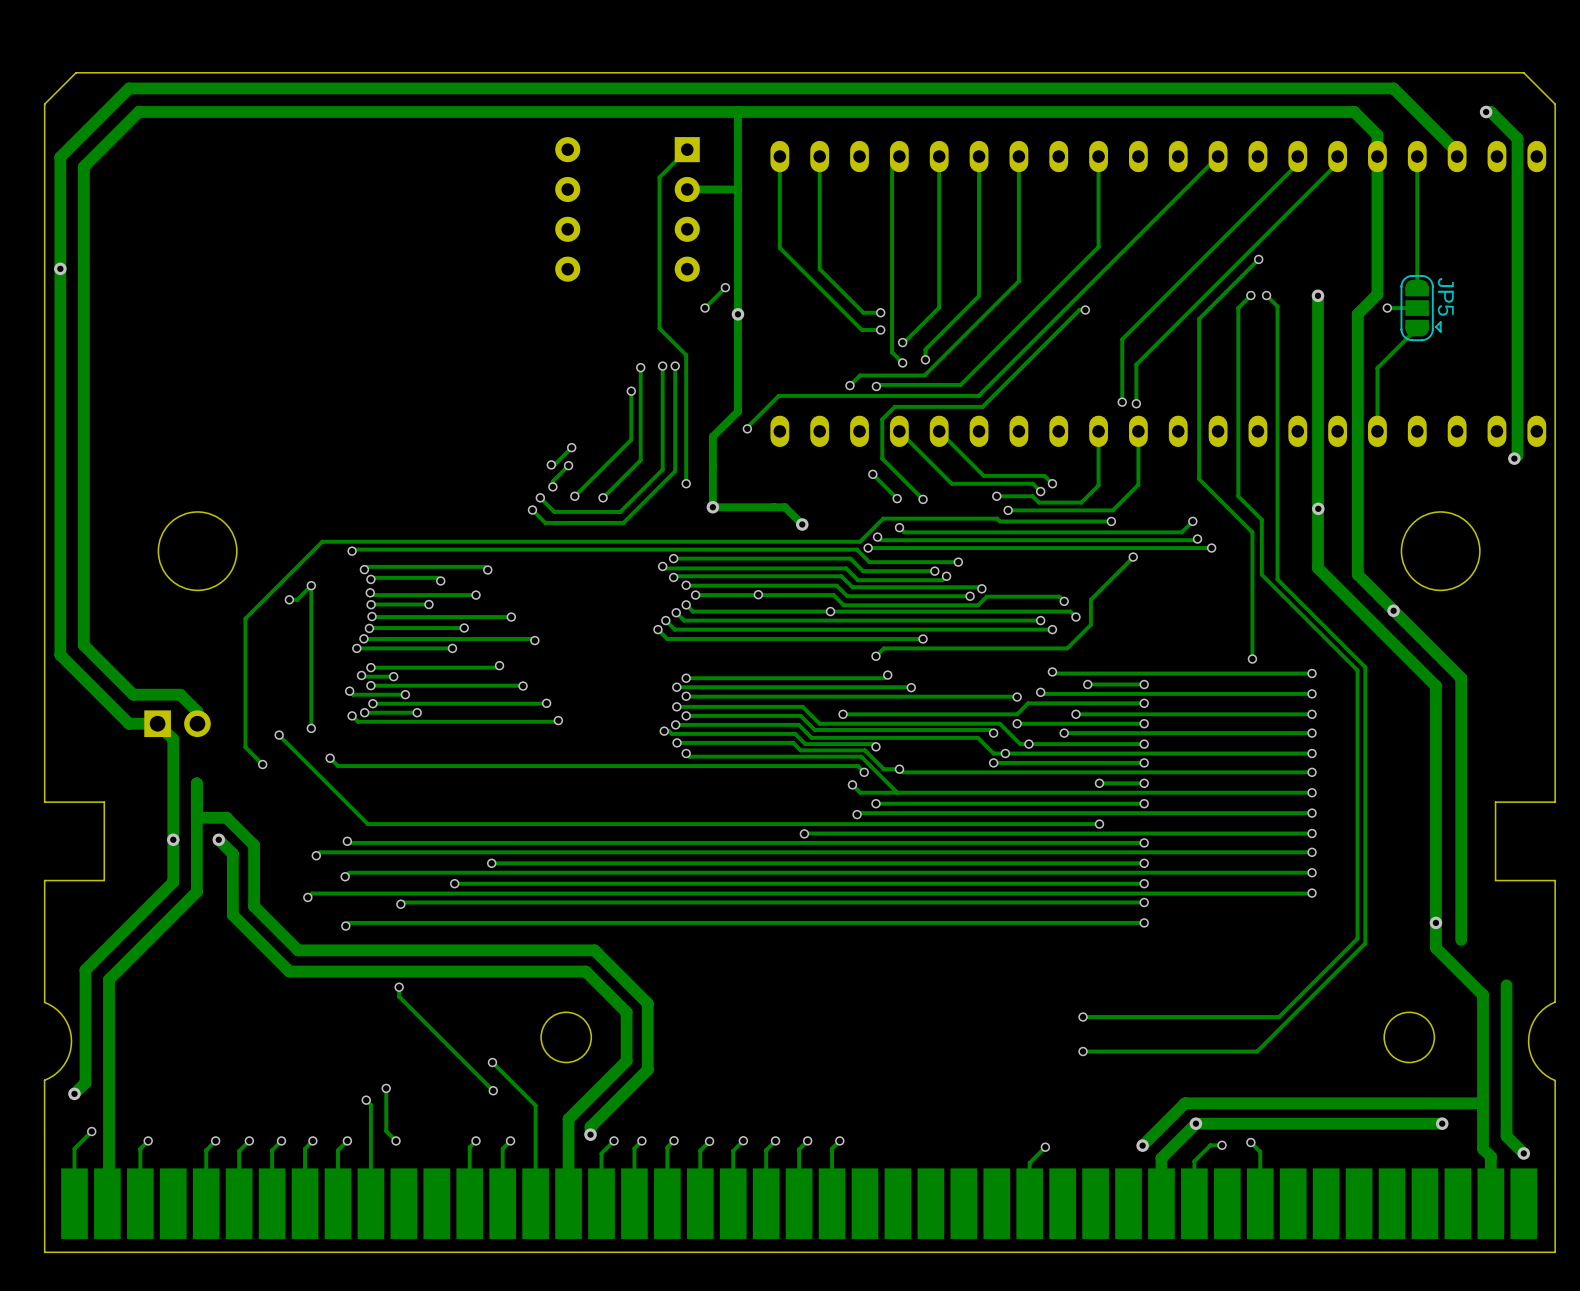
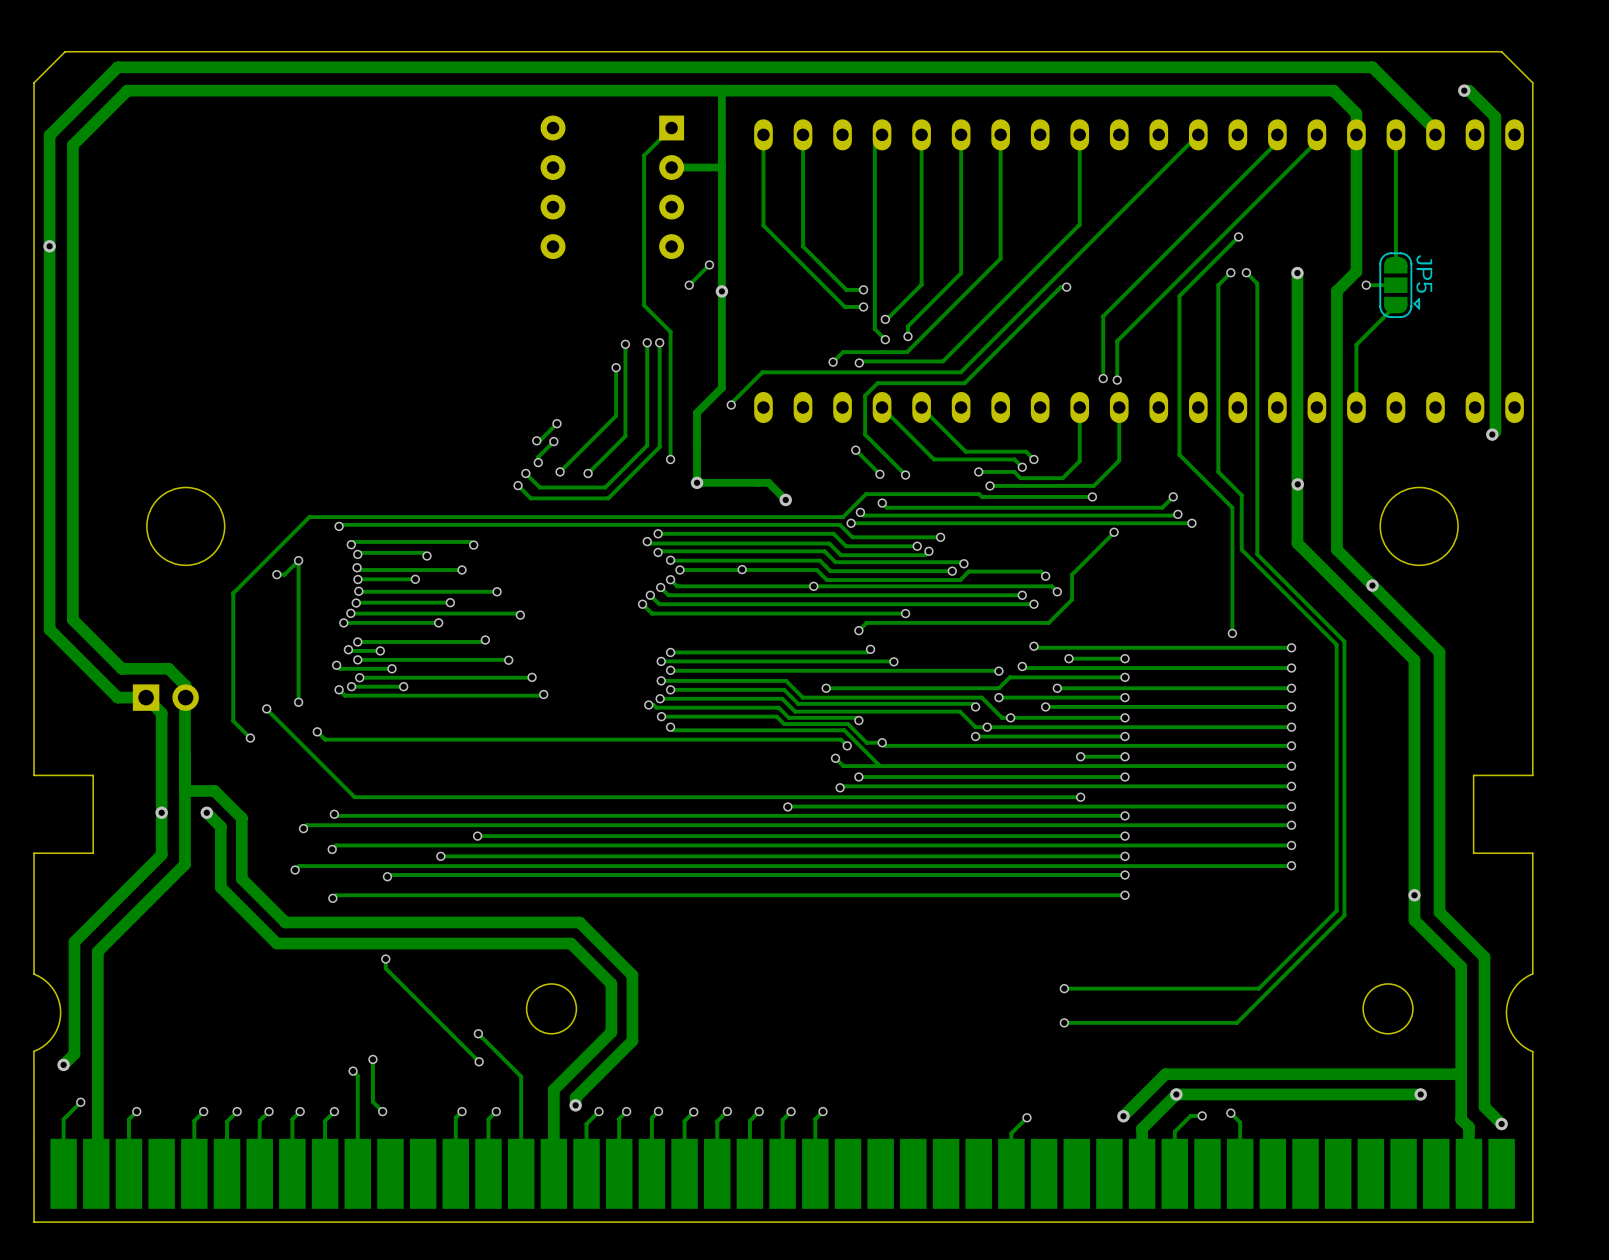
track: none -> (185, 695) (185, 756)
track: none -> (1439, 912) (1484, 957)

